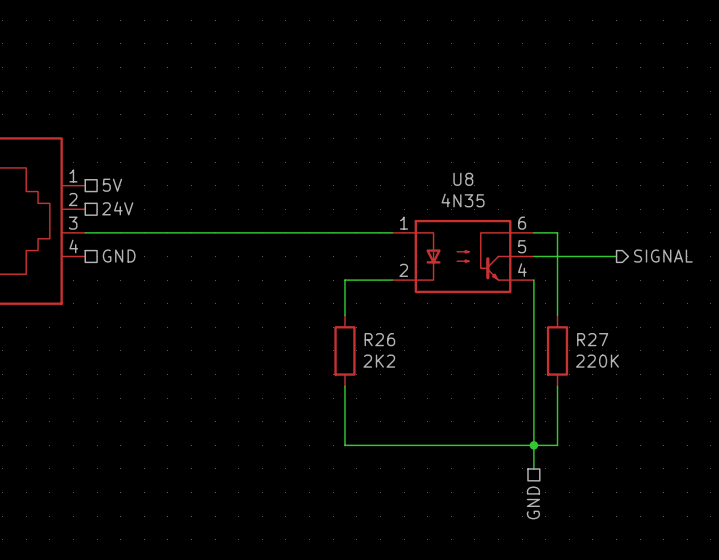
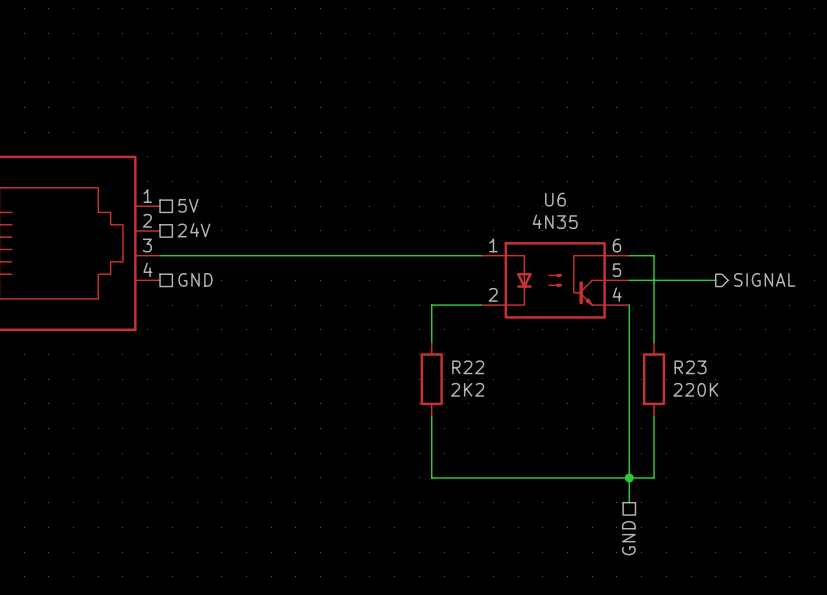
U8 name: U8 (463, 179) -> U6 (555, 199)
R26 name: R26 (379, 339) -> R22 (468, 367)
R27 name: R27 (592, 339) -> R23 (690, 367)

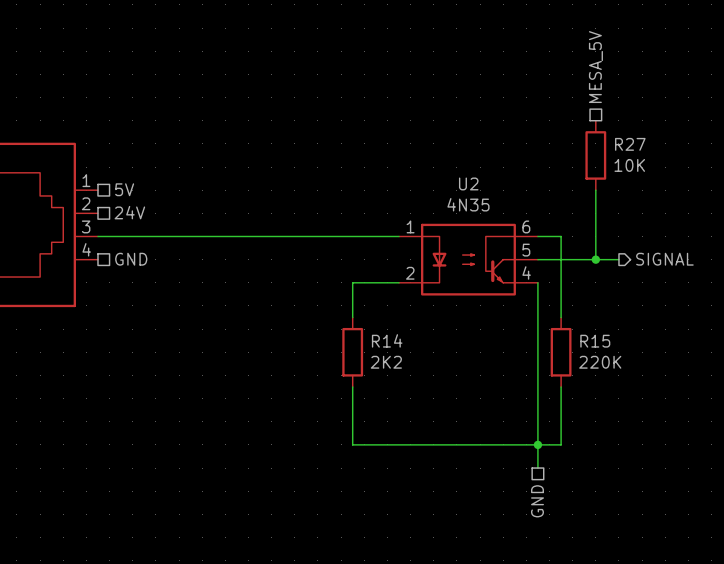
hierarchical label: none -> MESA_5V (595, 67)
R27: none -> 10K (595, 155)
U6 name: U6 (555, 199) -> U2 (468, 183)
wire: none -> (595, 190) (595, 259)
junction: none -> (595, 259)
R22 name: R22 (468, 367) -> R14 (387, 340)
R23 name: R23 (690, 367) -> R15 (595, 341)

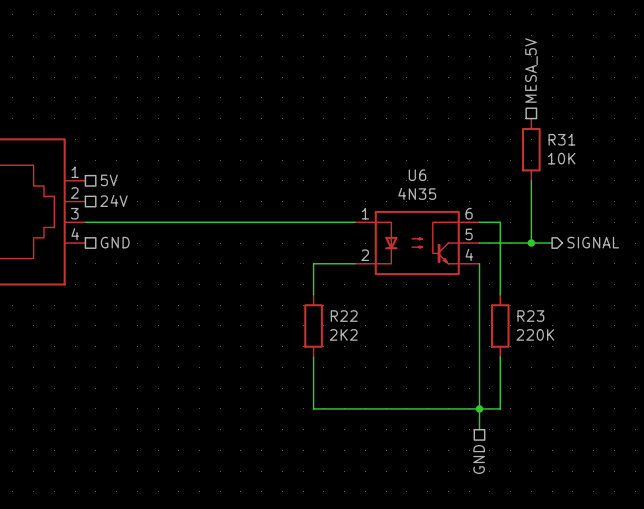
R27 name: R27 (630, 144) -> R31 (561, 139)
U2 name: U2 (468, 183) -> U6 (417, 175)
R14 name: R14 (387, 340) -> R22 (344, 316)
R15 name: R15 (595, 341) -> R23 (530, 316)

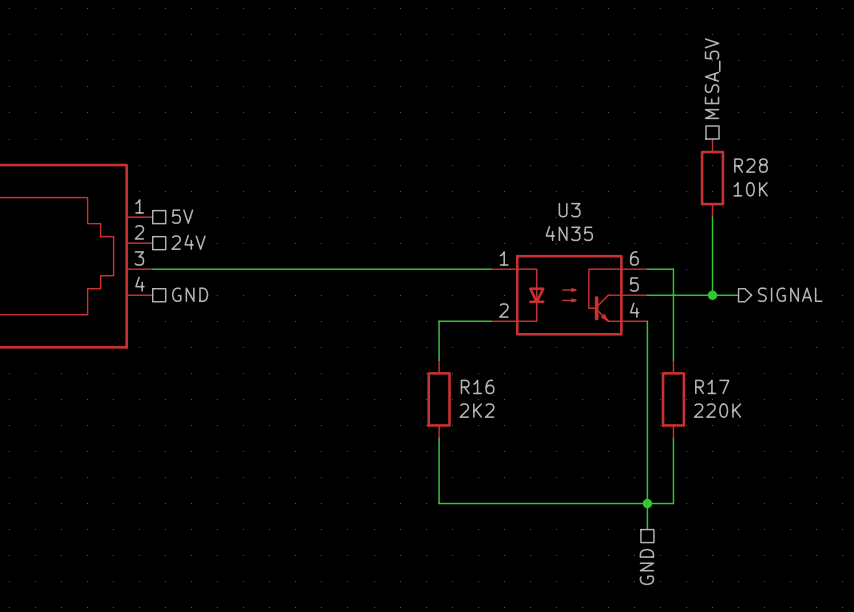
R31 name: R31 (561, 139) -> R28 (750, 165)
U6 name: U6 (417, 175) -> U3 (569, 210)
R22 name: R22 (344, 316) -> R16 (477, 386)
R23 name: R23 (530, 316) -> R17 (712, 386)

